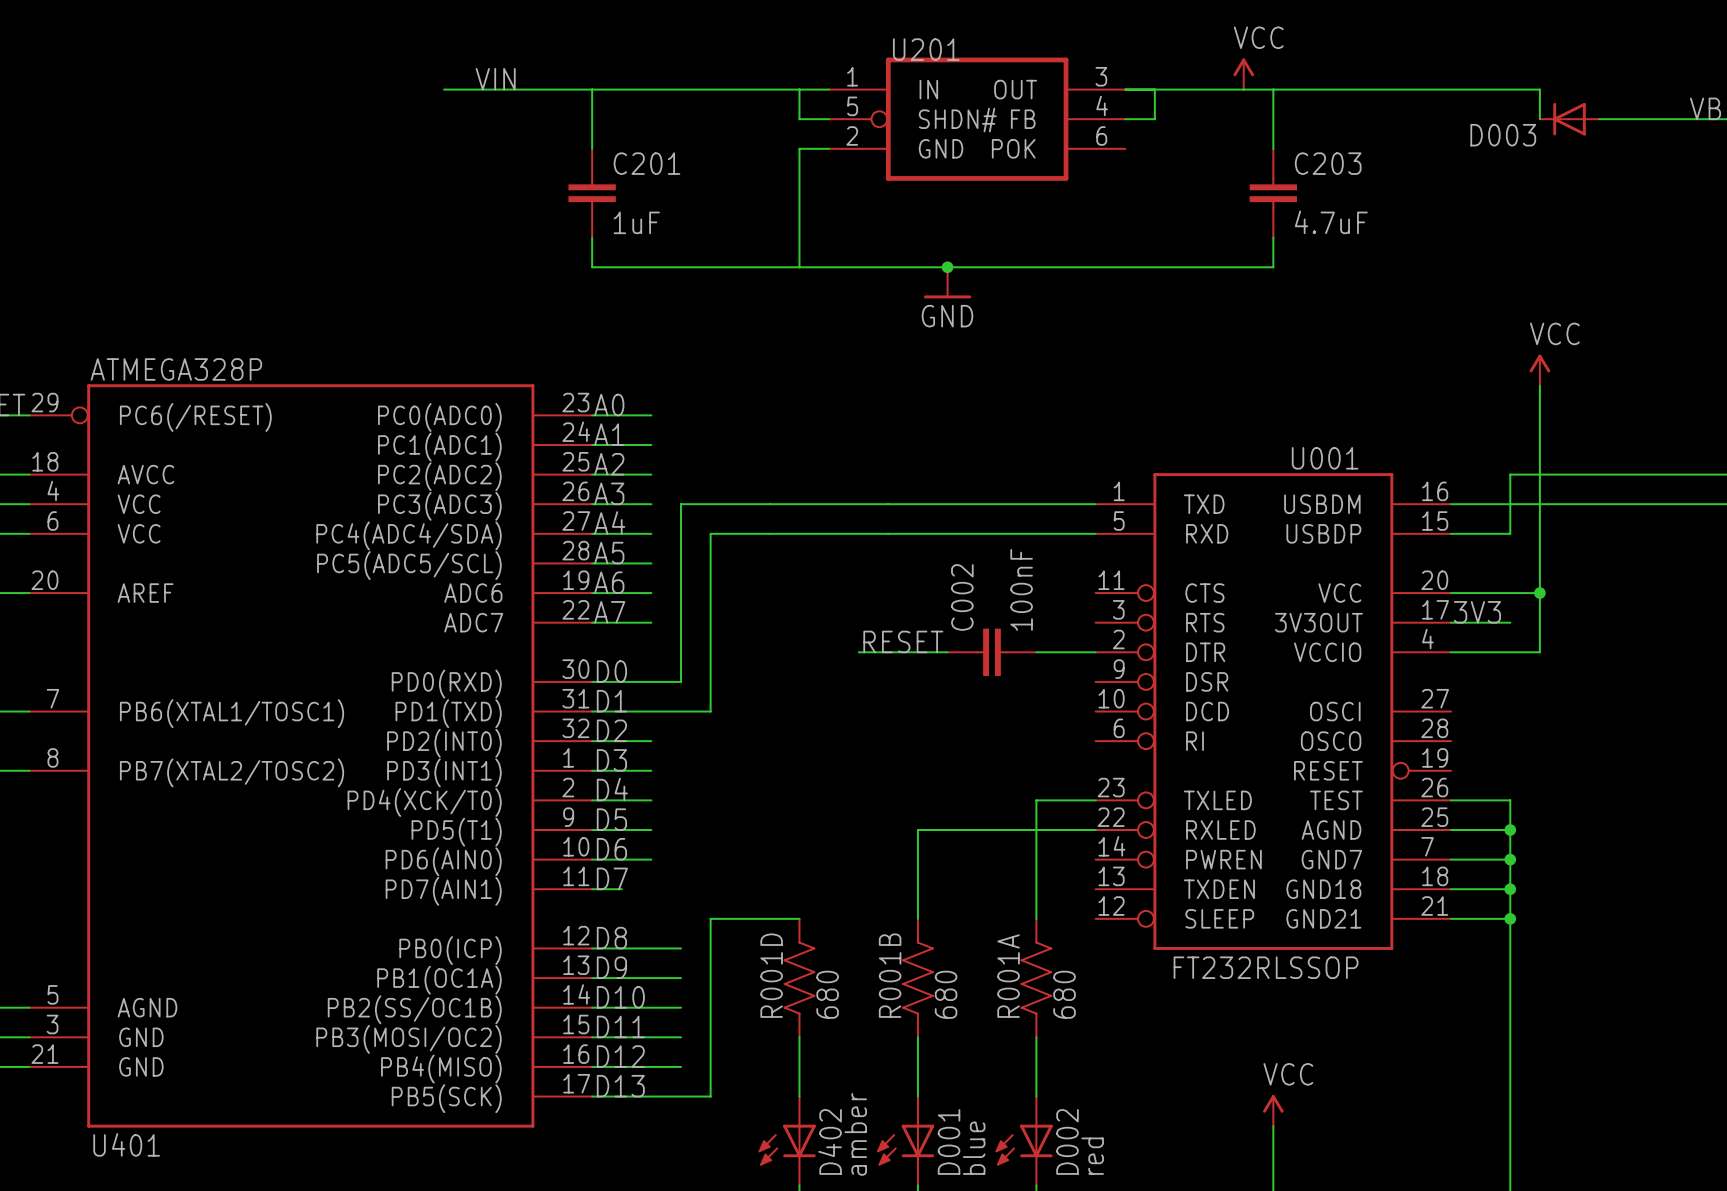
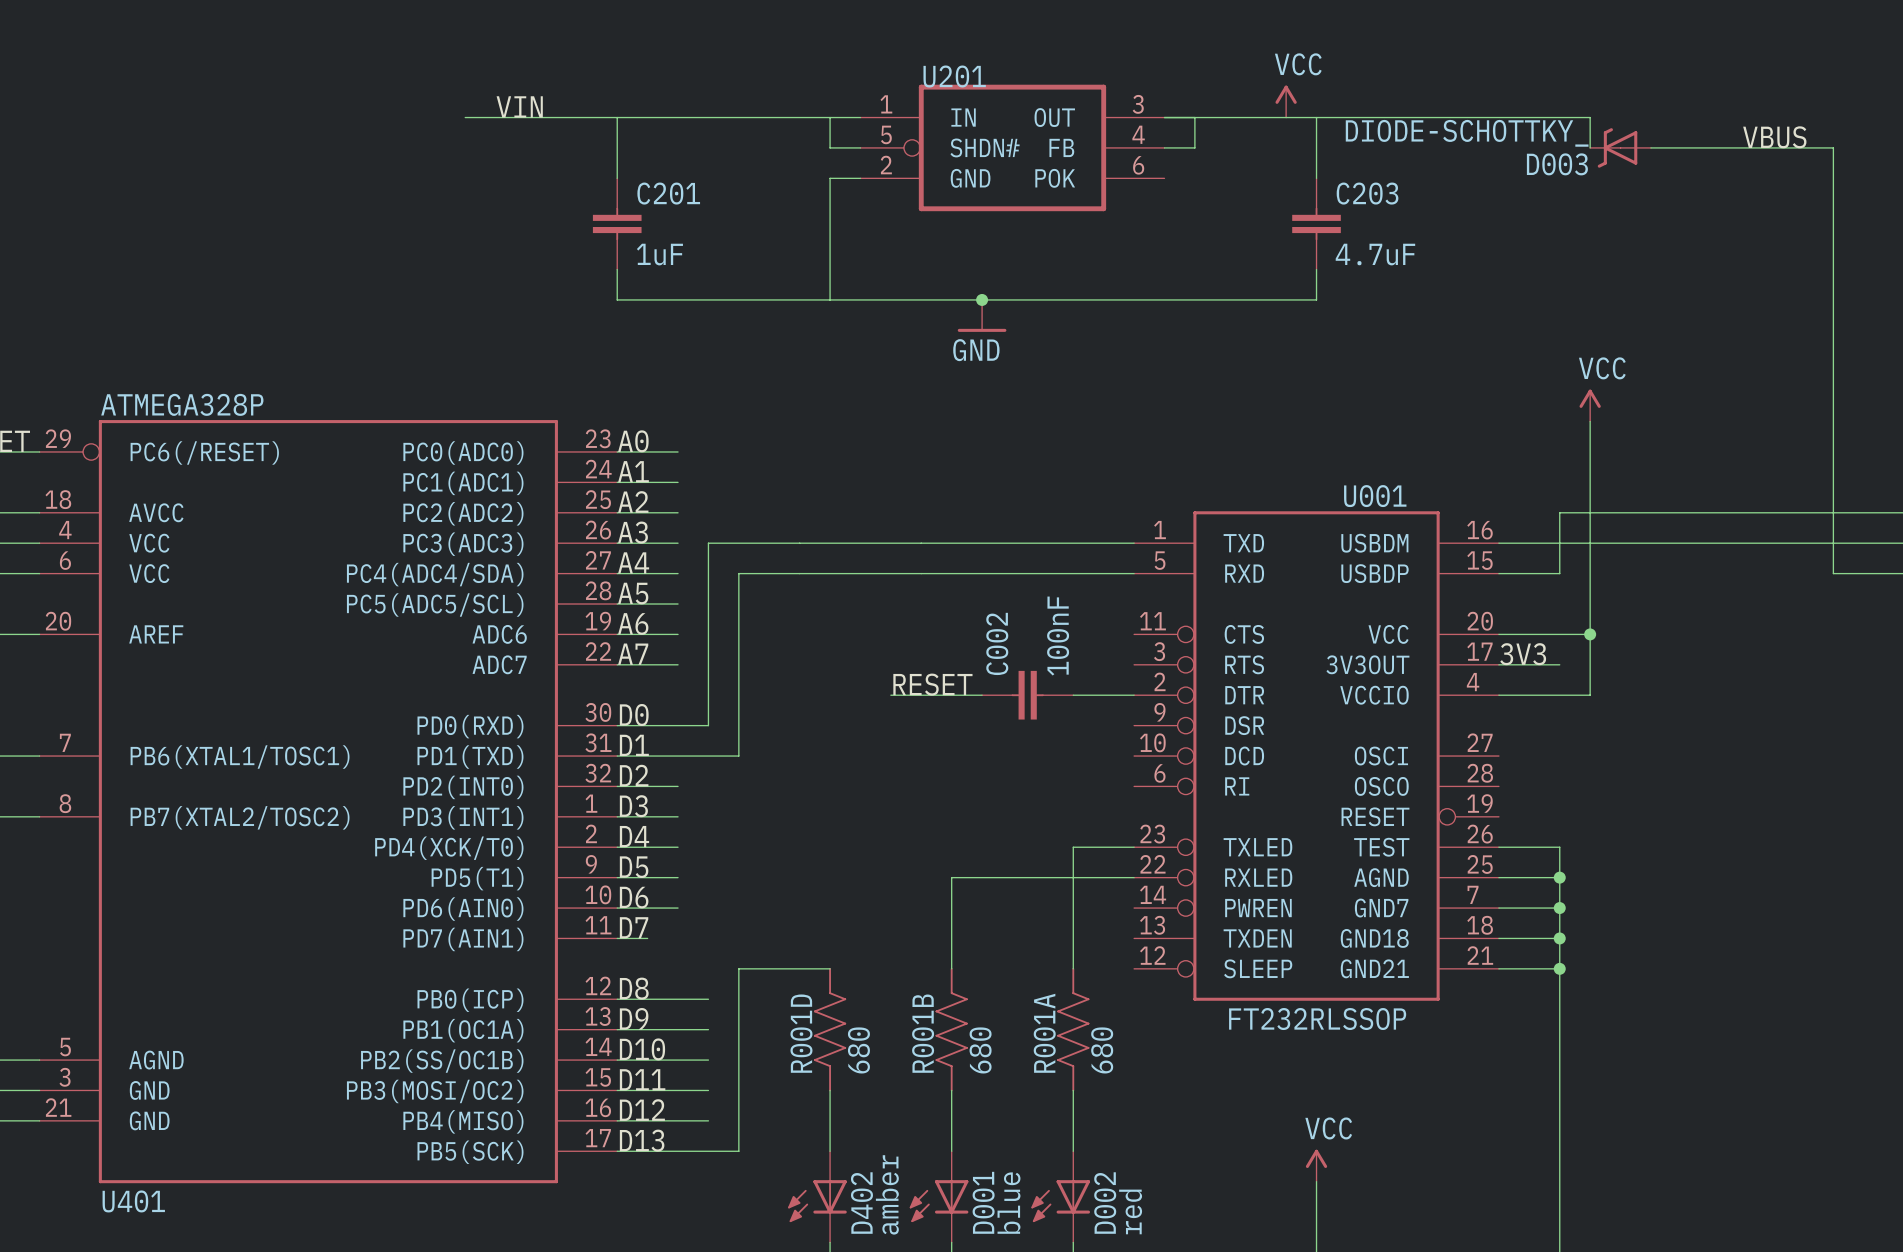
D003 symbol: [1539, 102, 1600, 136] -> [1590, 128, 1651, 168]
D003 value: none -> DIODE-SCHOTTKY_ (1467, 133)

